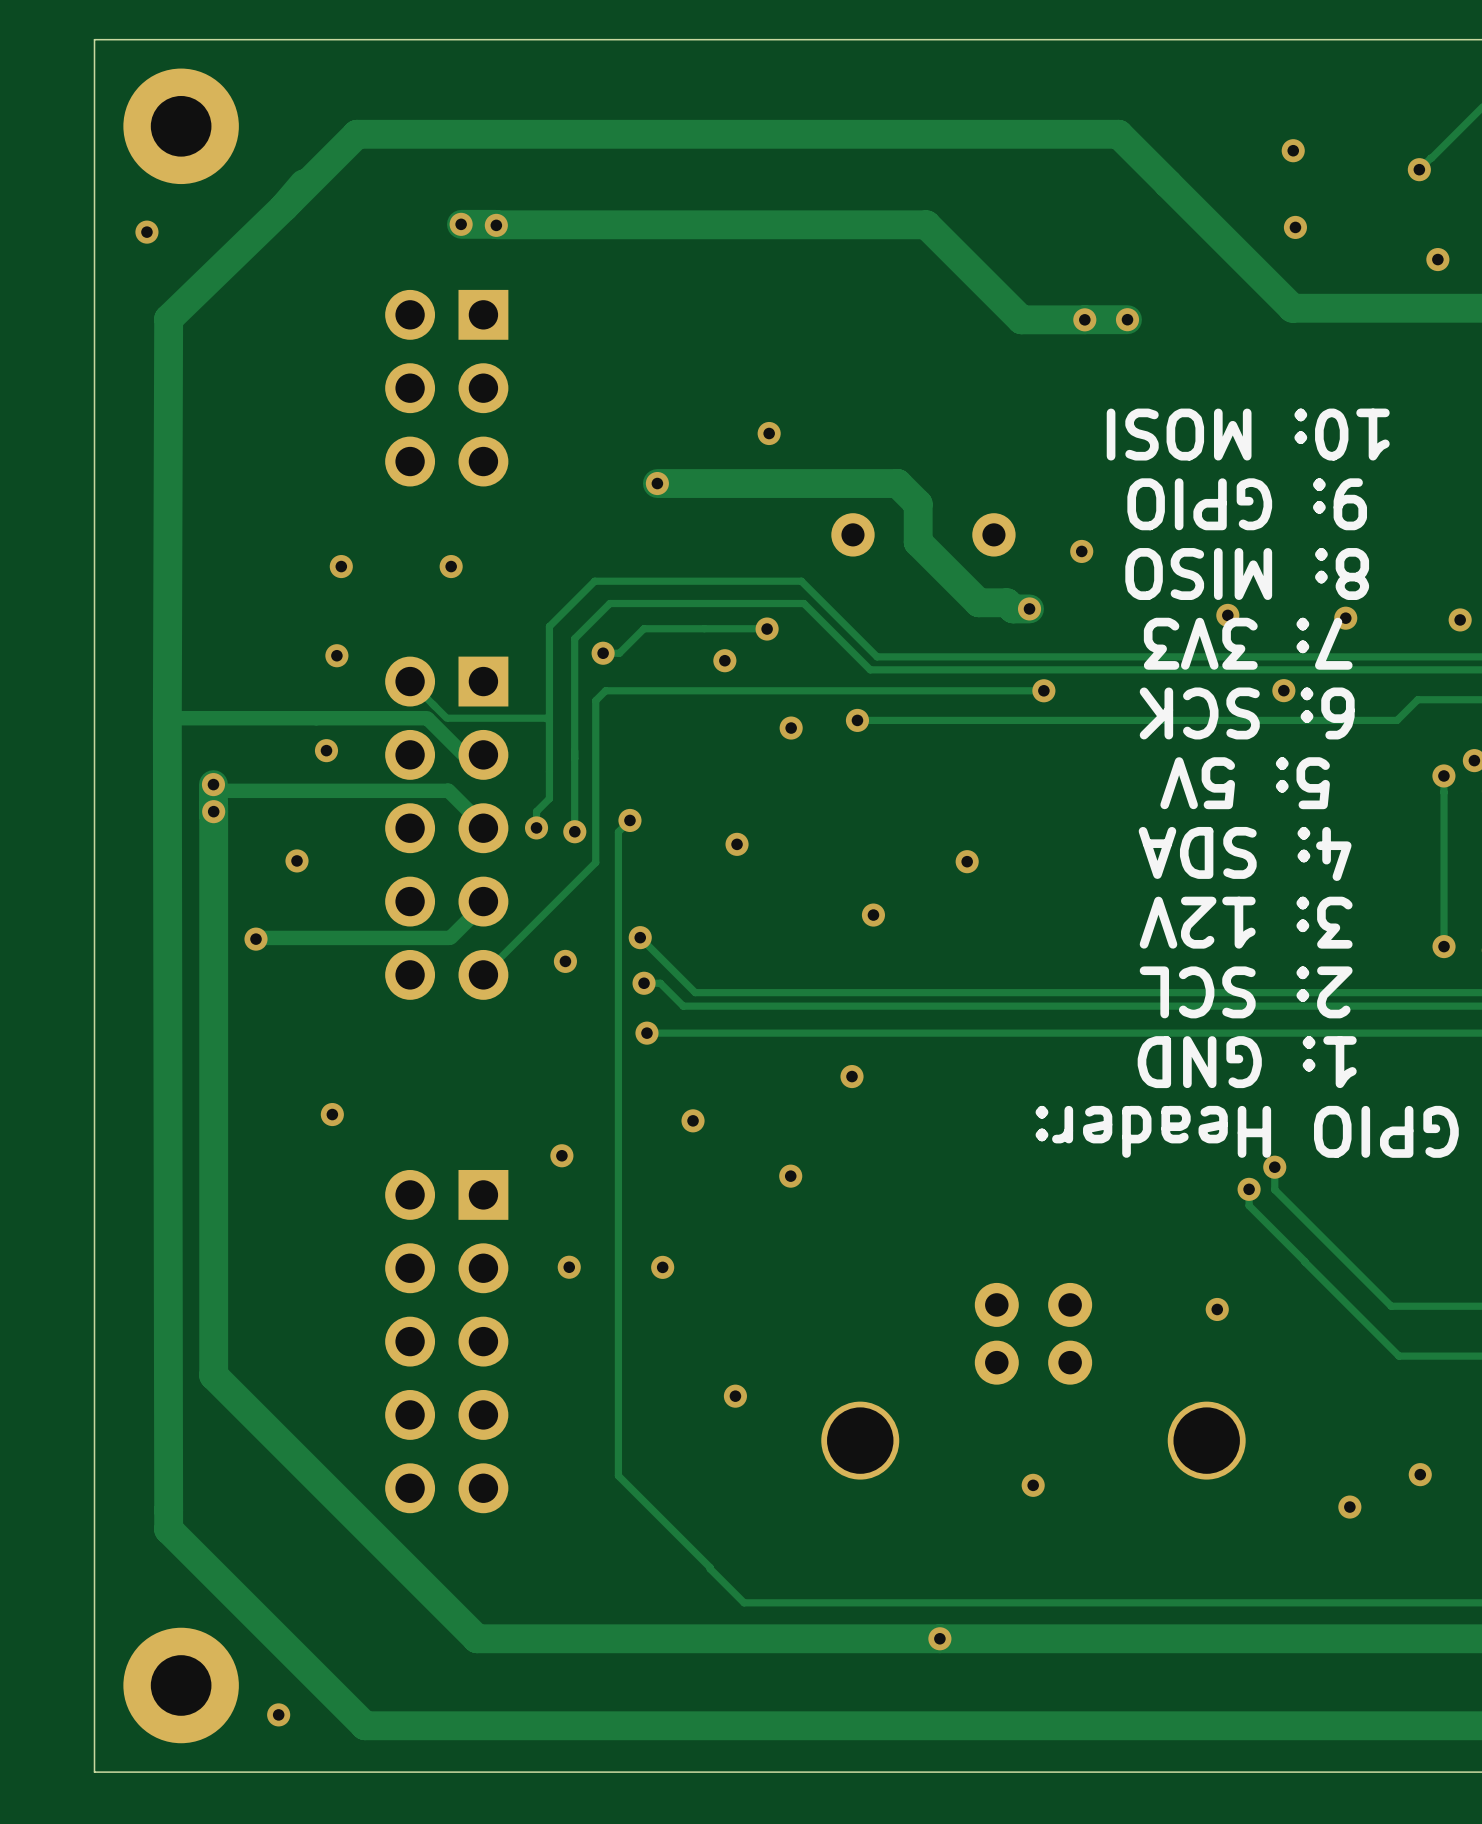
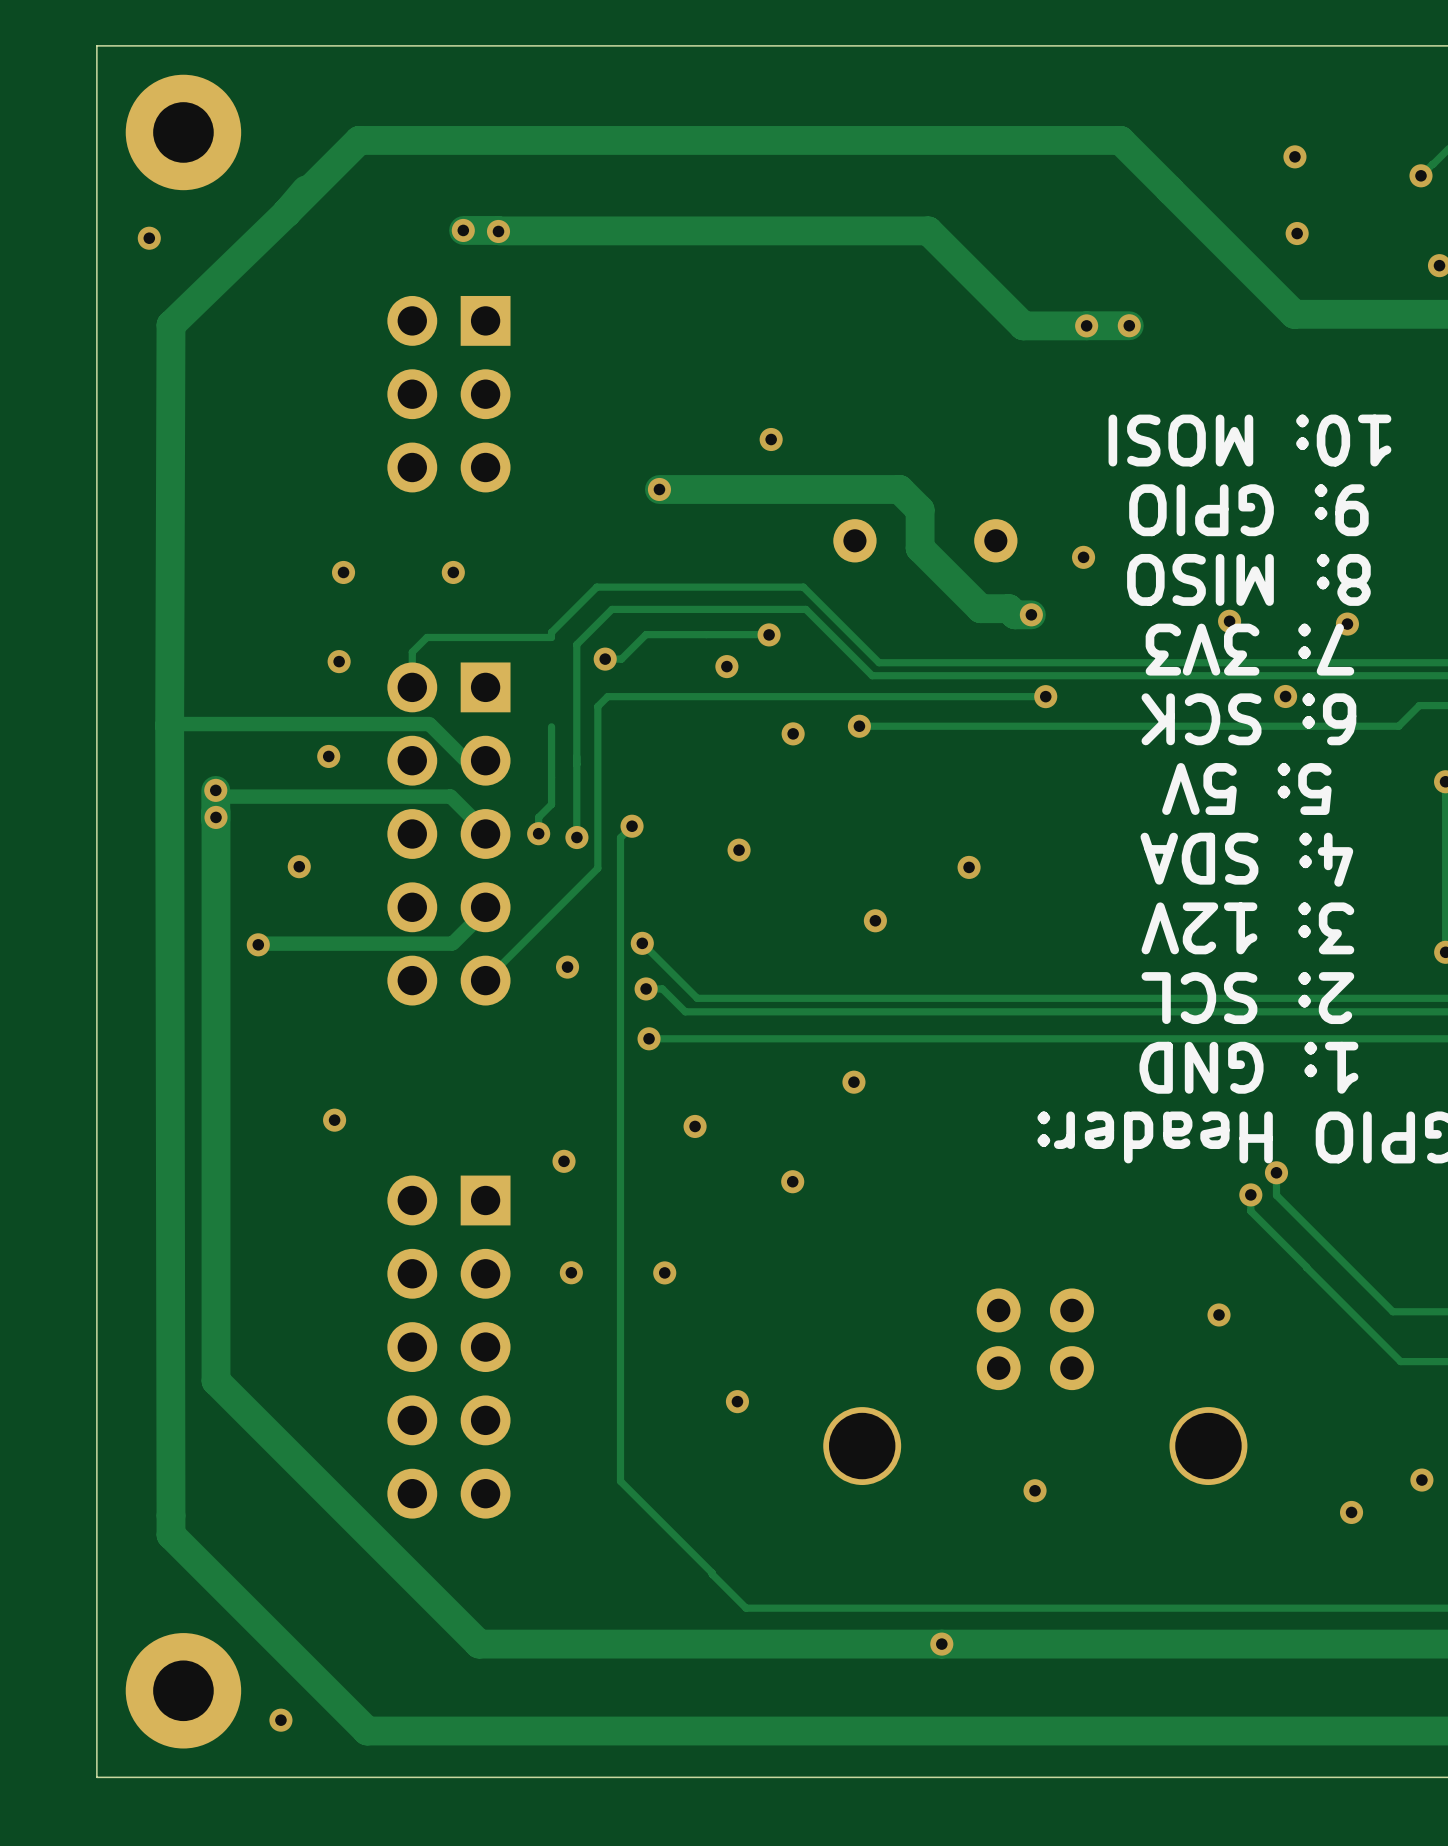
track: (549, 626) (549, 721) (546, 718) (449, 718) -> (551, 632) (551, 637) (426, 637) (412, 652) (412, 687)
track: (410, 681) (446, 718) -> none

